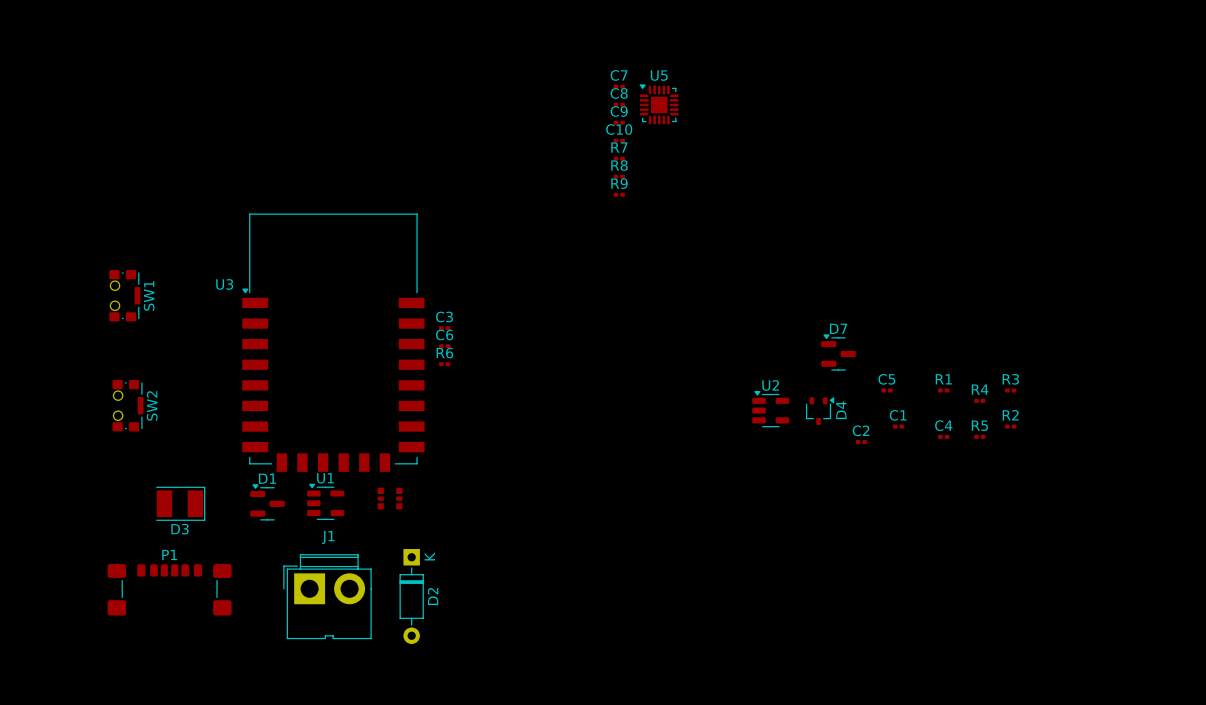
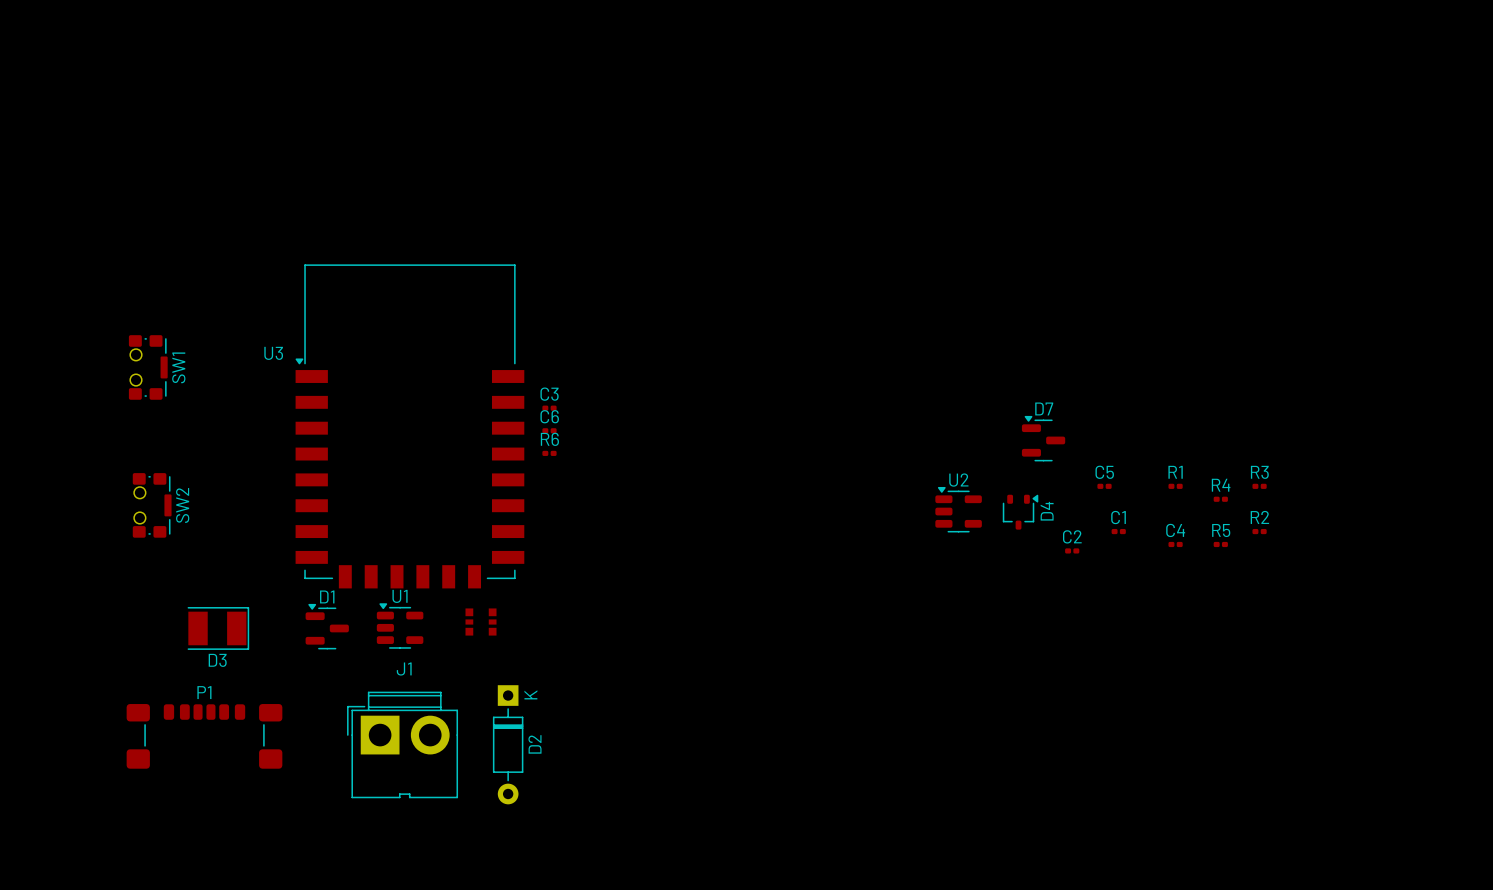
C7: (619, 86) -> none
C8: (619, 104) -> none
U5: (659, 104) -> none
C9: (619, 122) -> none
C10: (619, 140) -> none
R7: (619, 158) -> none
R8: (619, 176) -> none
R9: (619, 194) -> none

